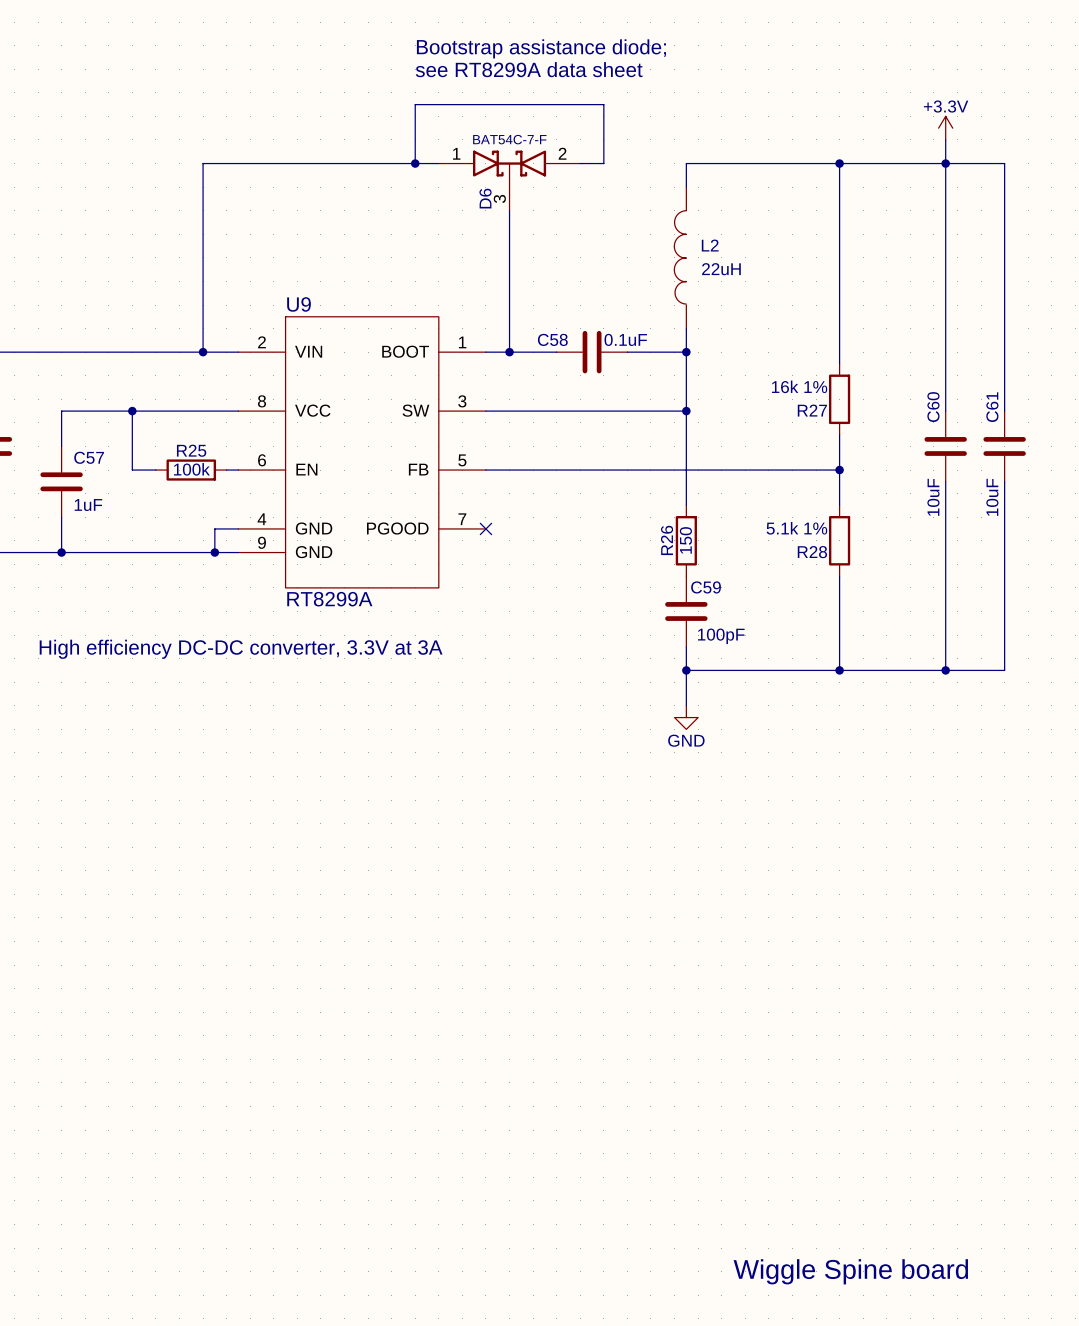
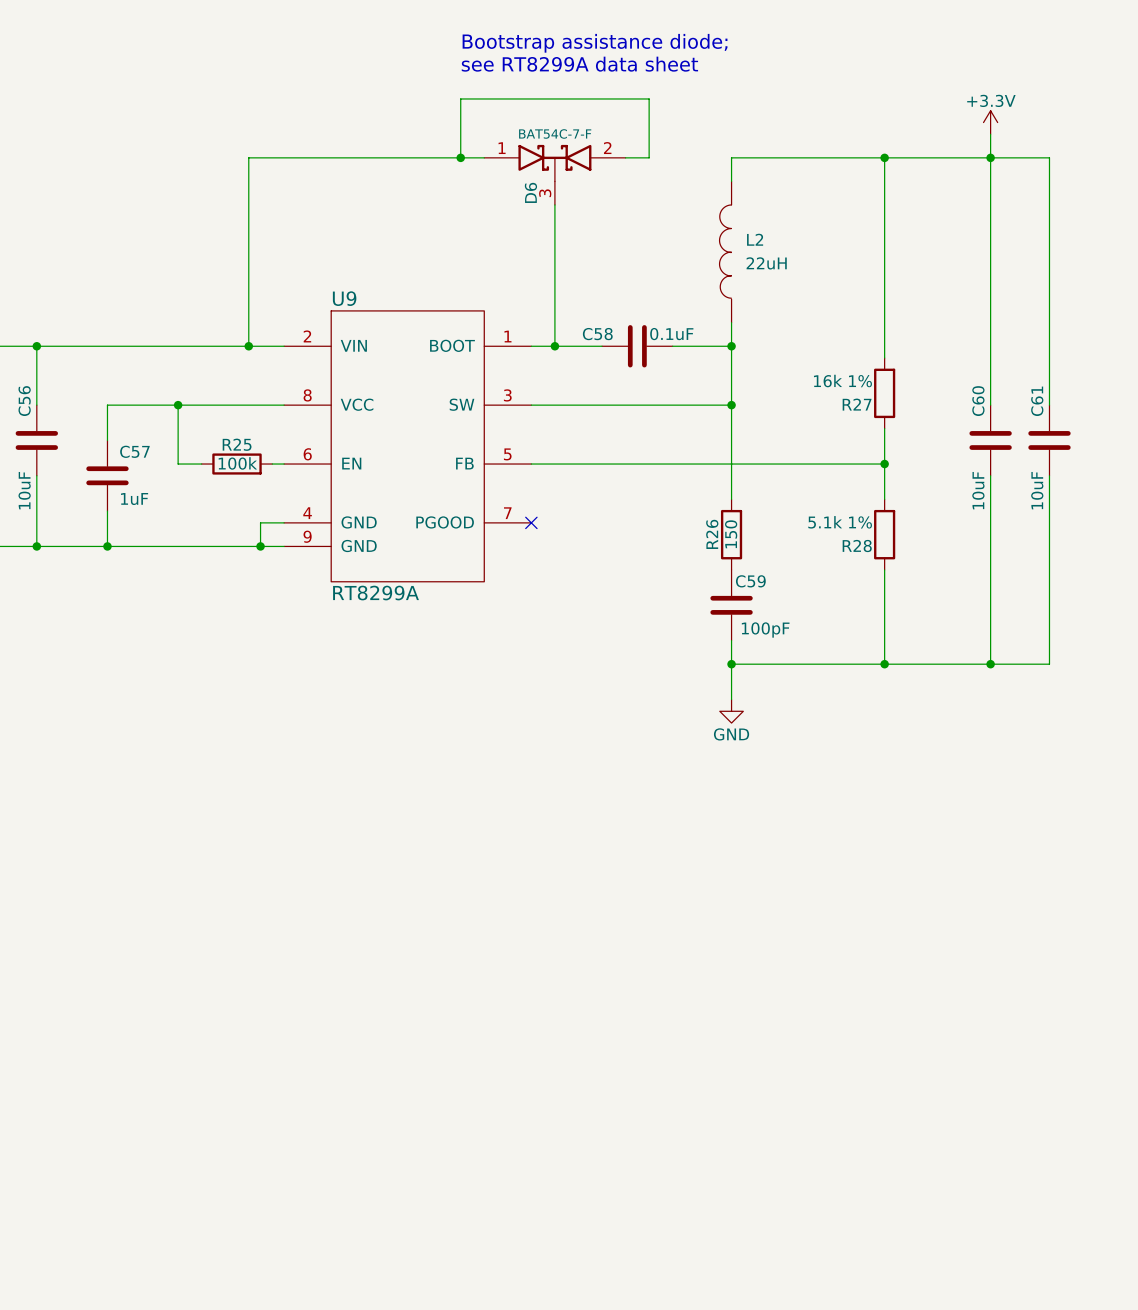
text: High efficiency DC-DC converter, 3.3V at 3A (241, 649) -> none
text: Wiggle Spine board (850, 1271) -> none

